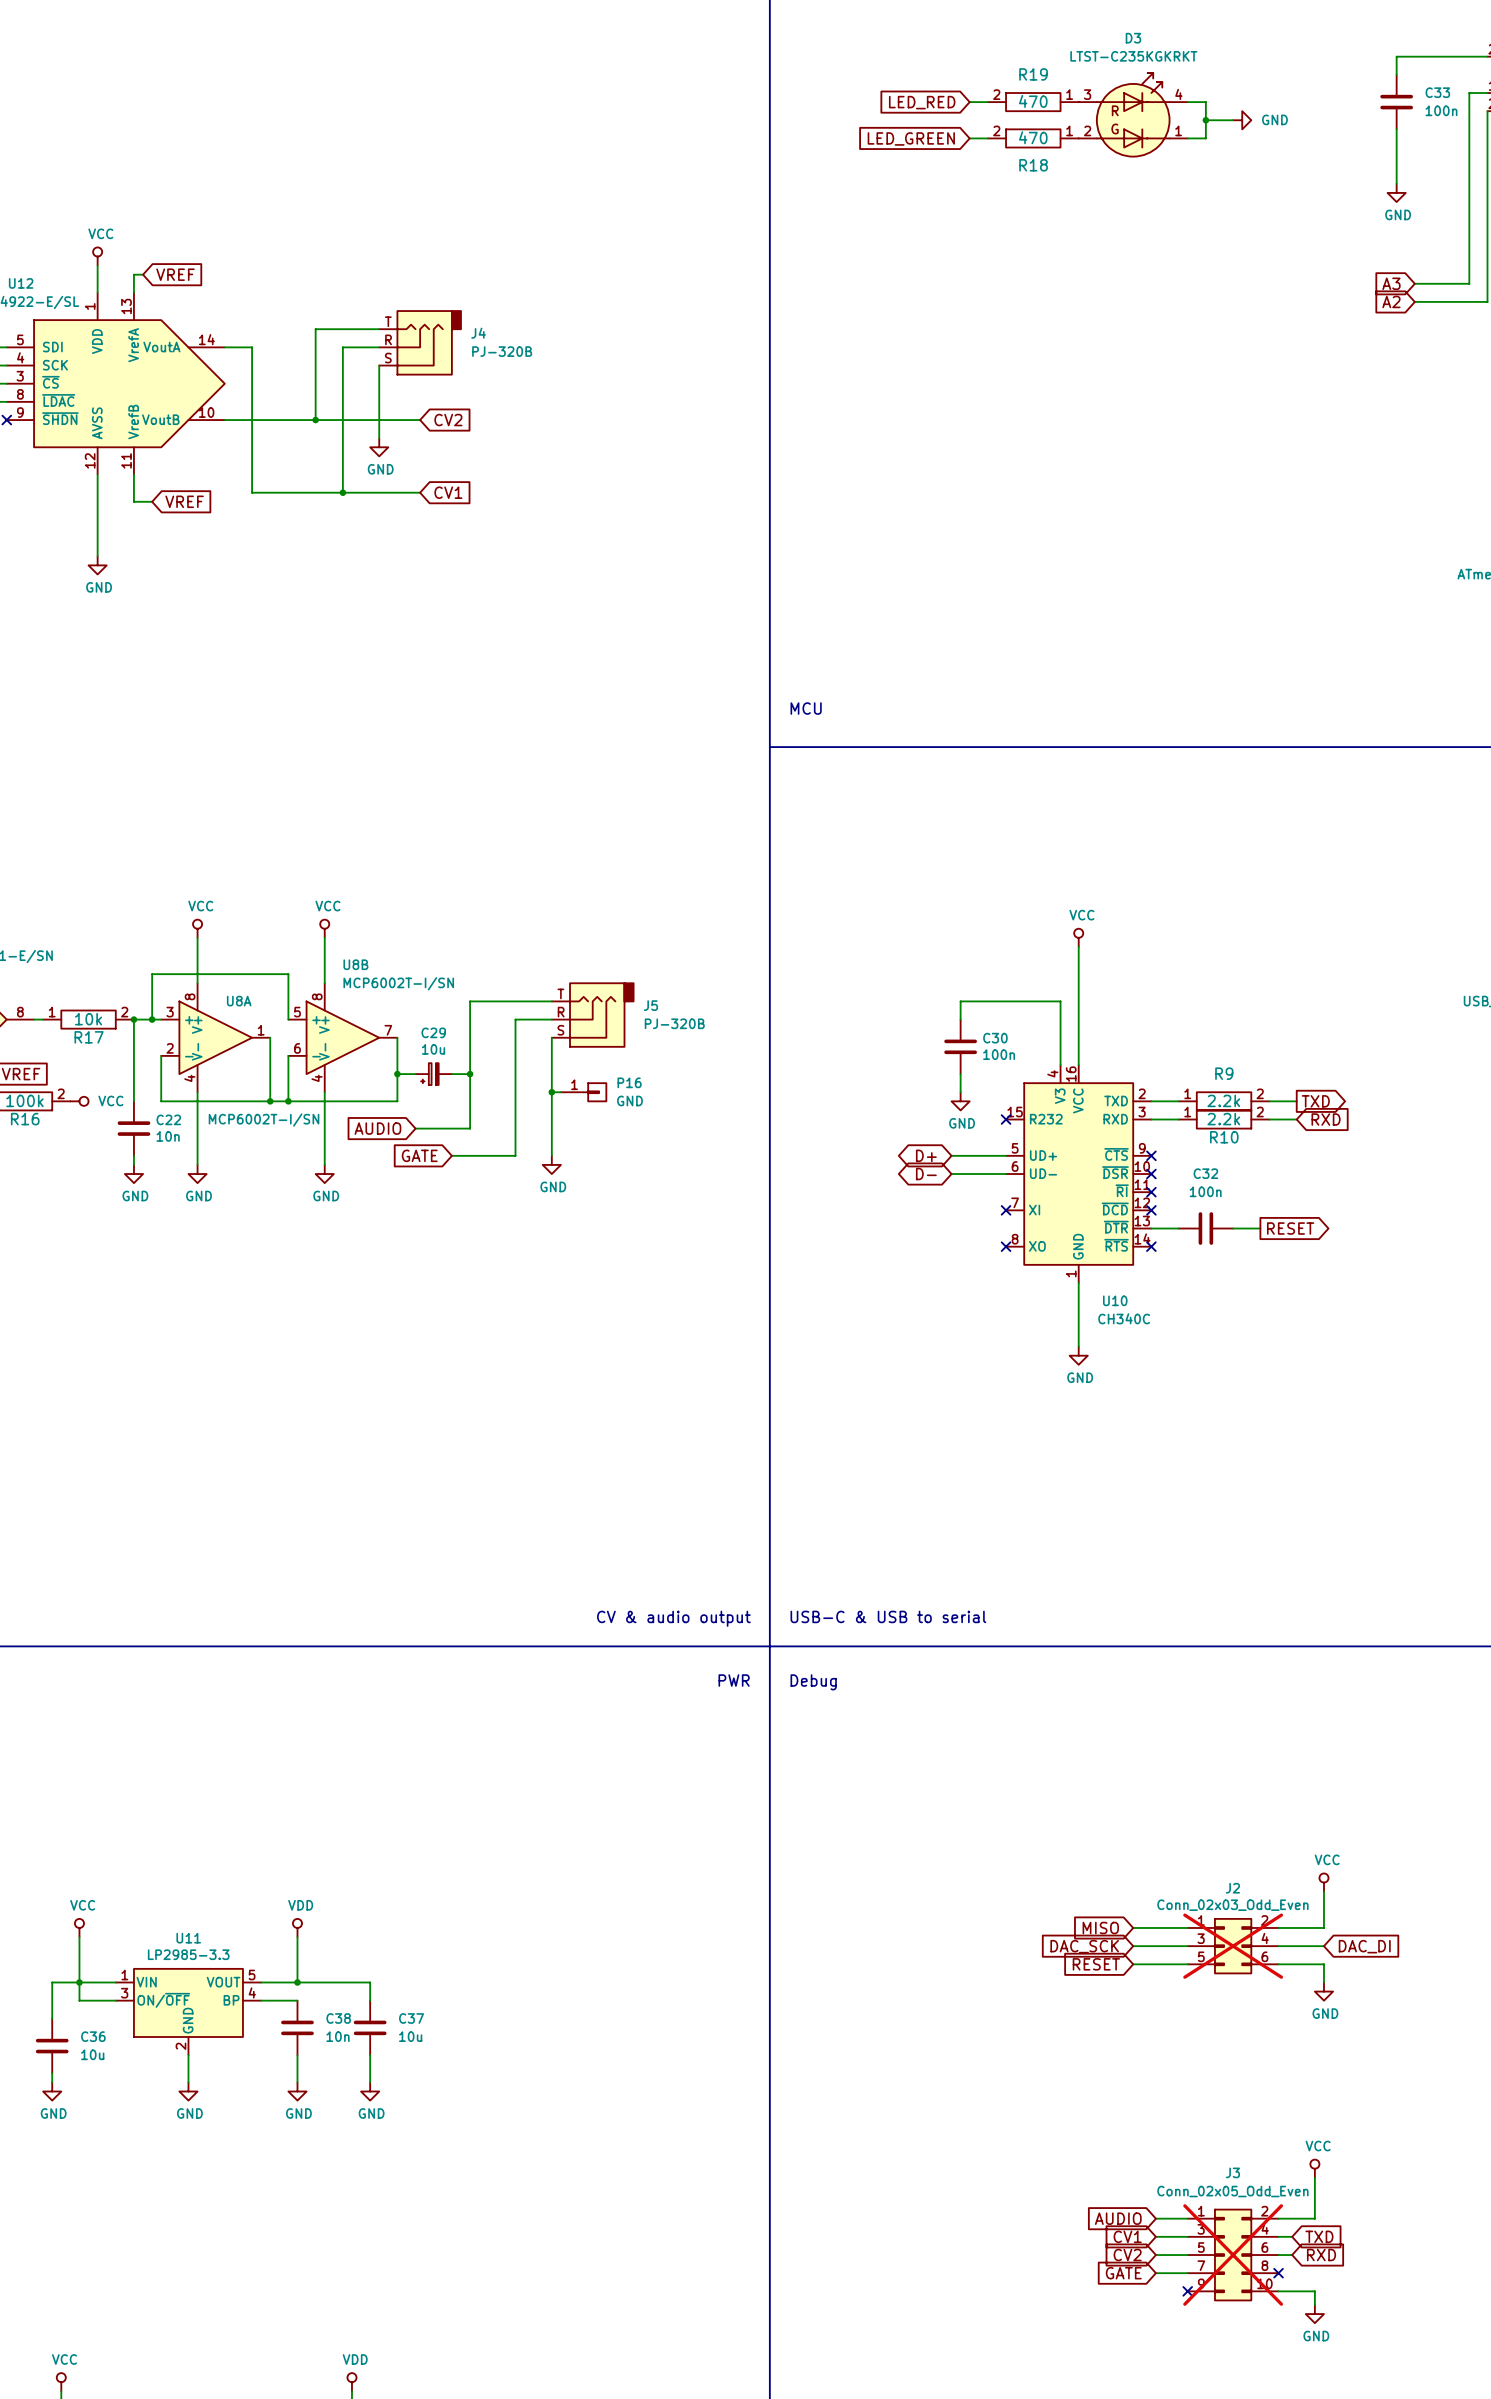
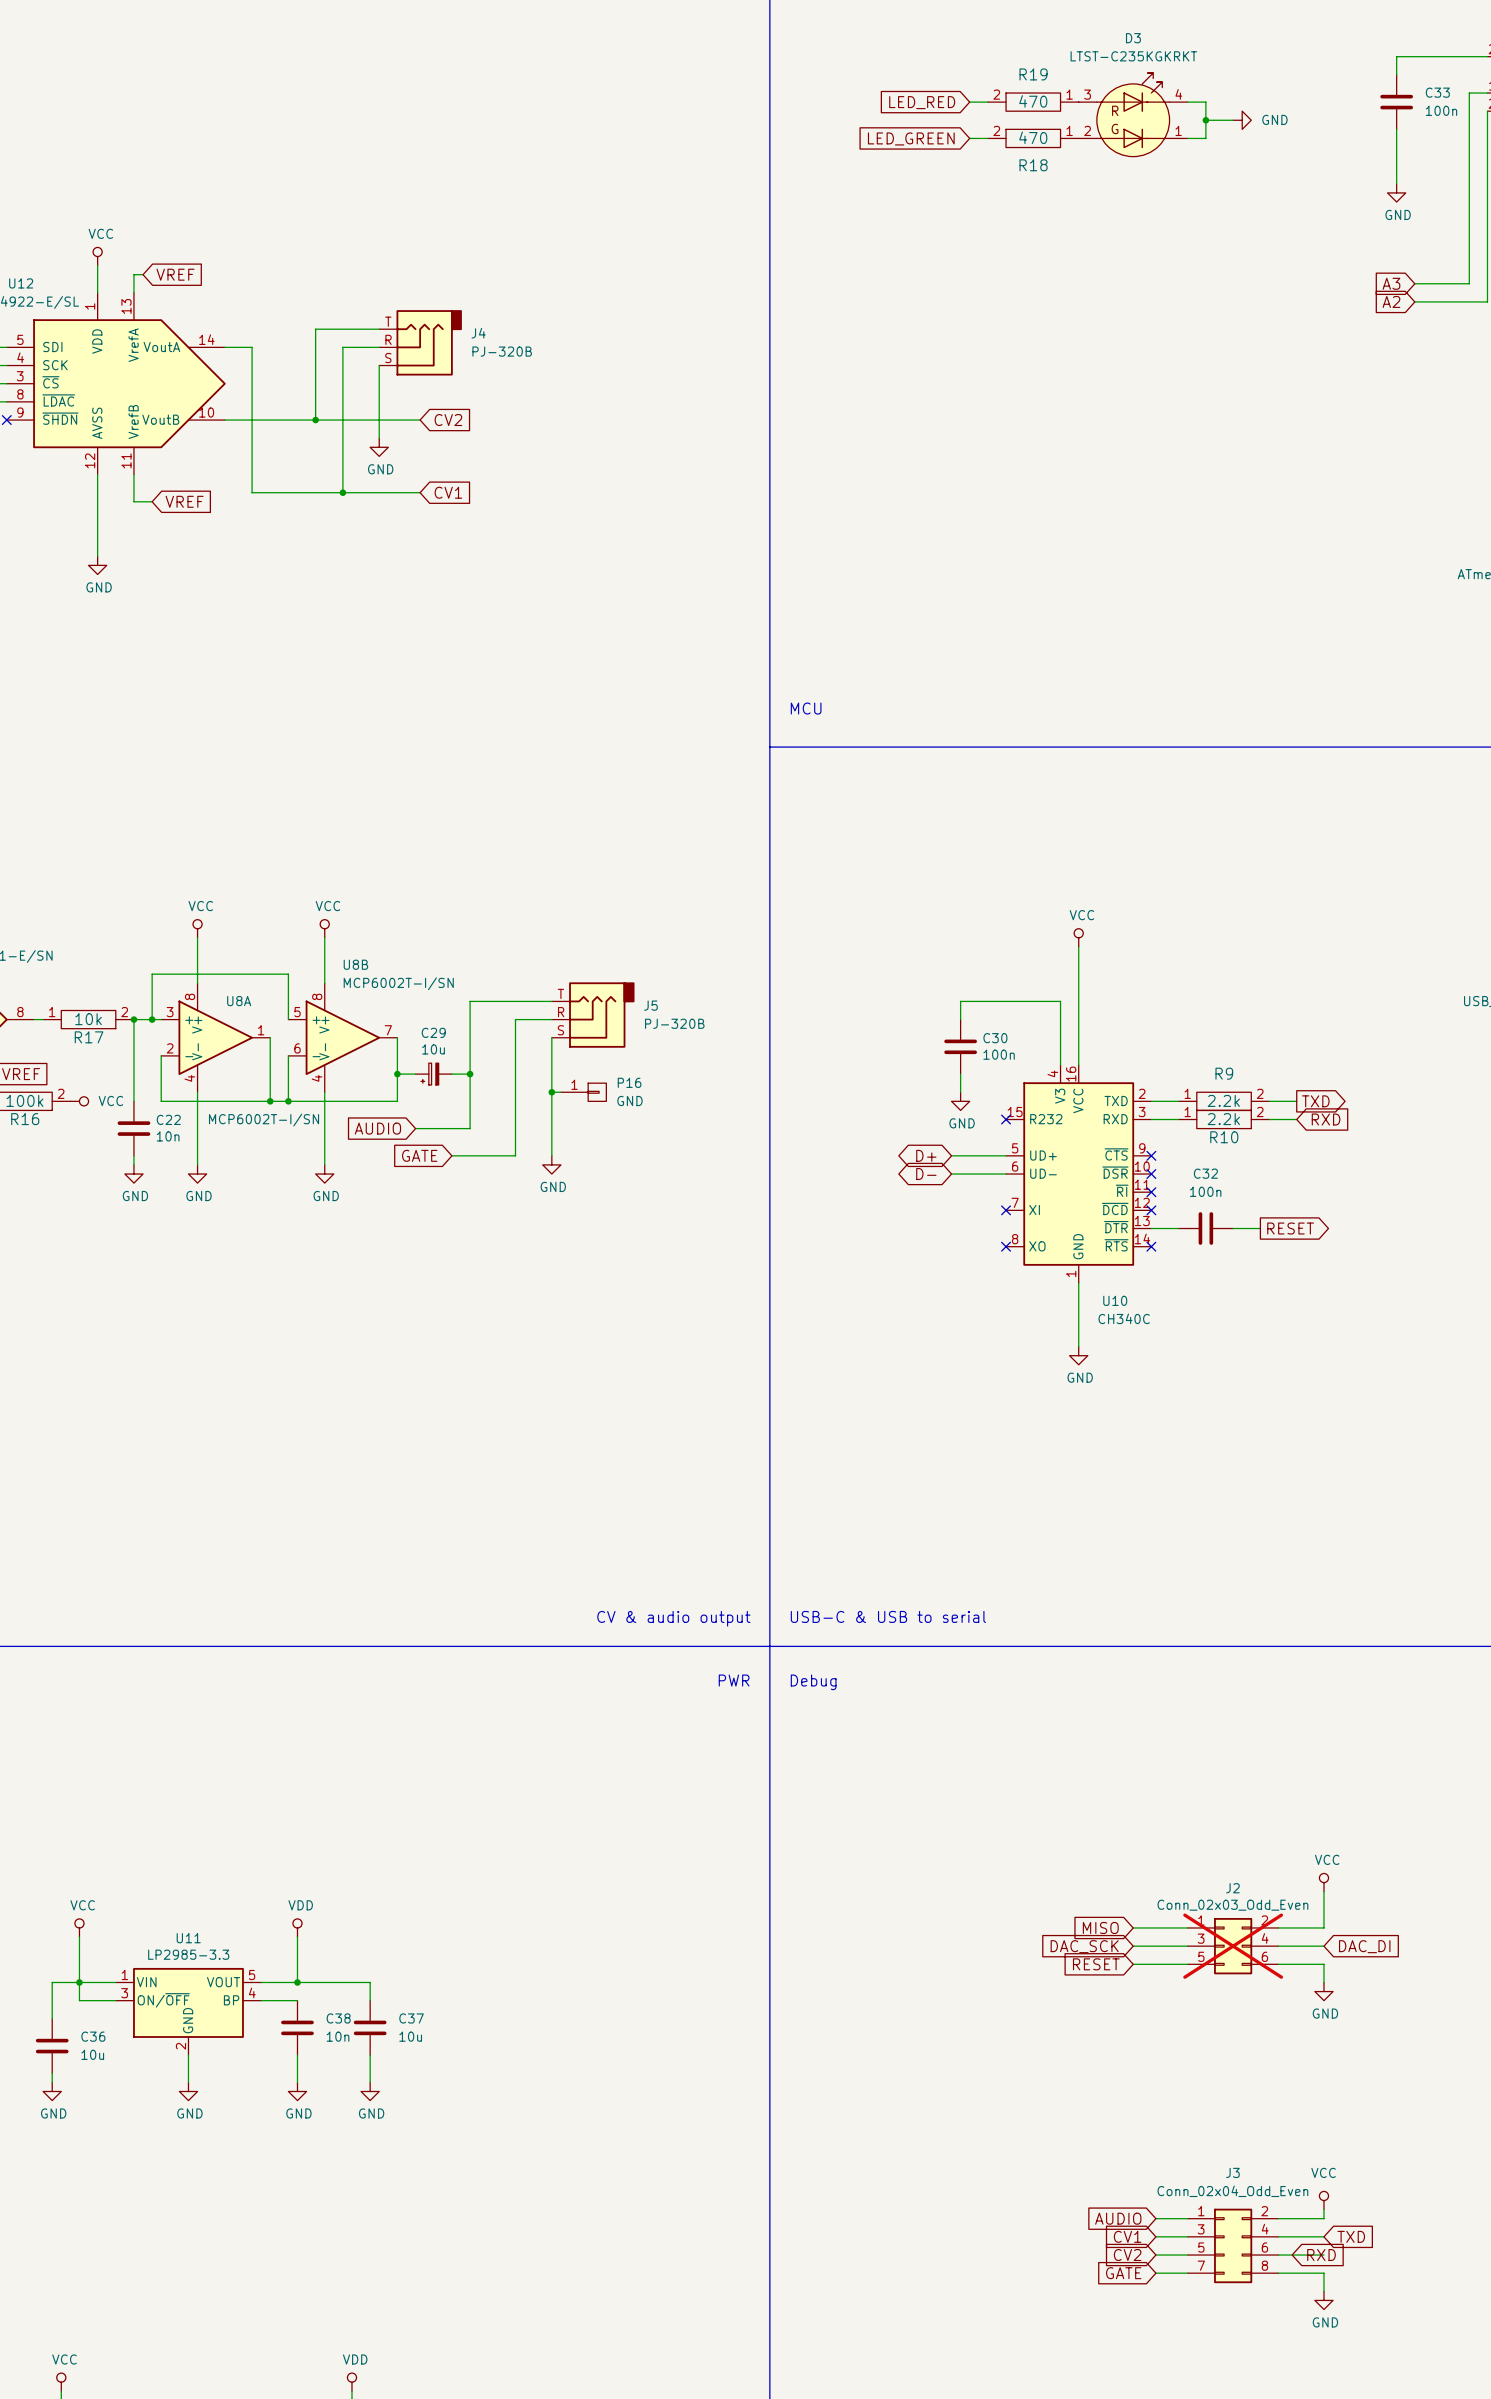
power symbol text position: VCC (1318, 2146) -> VCC (1323, 2172)
power symbol position: VCC (1314, 2168) -> VCC (1323, 2200)
wire: (1314, 2177) (1314, 2218) -> (1323, 2209) (1323, 2218) (1314, 2218)
J3 value: Conn_02x05_Odd_Even (1232, 2191) -> Conn_02x04_Odd_Even (1232, 2191)
J3 symbol: [1187, 2208, 1279, 2302] -> [1187, 2208, 1279, 2284]
wire: none -> (1292, 2236) (1323, 2236)
global label position: TXD (1319, 2236) -> TXD (1351, 2236)
J3 do-not-place cross: (1233, 2255) -> none
wire: none -> (1292, 2255) (1323, 2255)
wire: none -> (1278, 2273) (1323, 2273) (1323, 2291)
no-connect mark: (1278, 2273) -> none
no-connect mark: (1187, 2291) -> none
wire: (1278, 2291) (1314, 2291) (1314, 2304) -> none
power symbol position: GND (1314, 2314) -> GND (1323, 2300)

